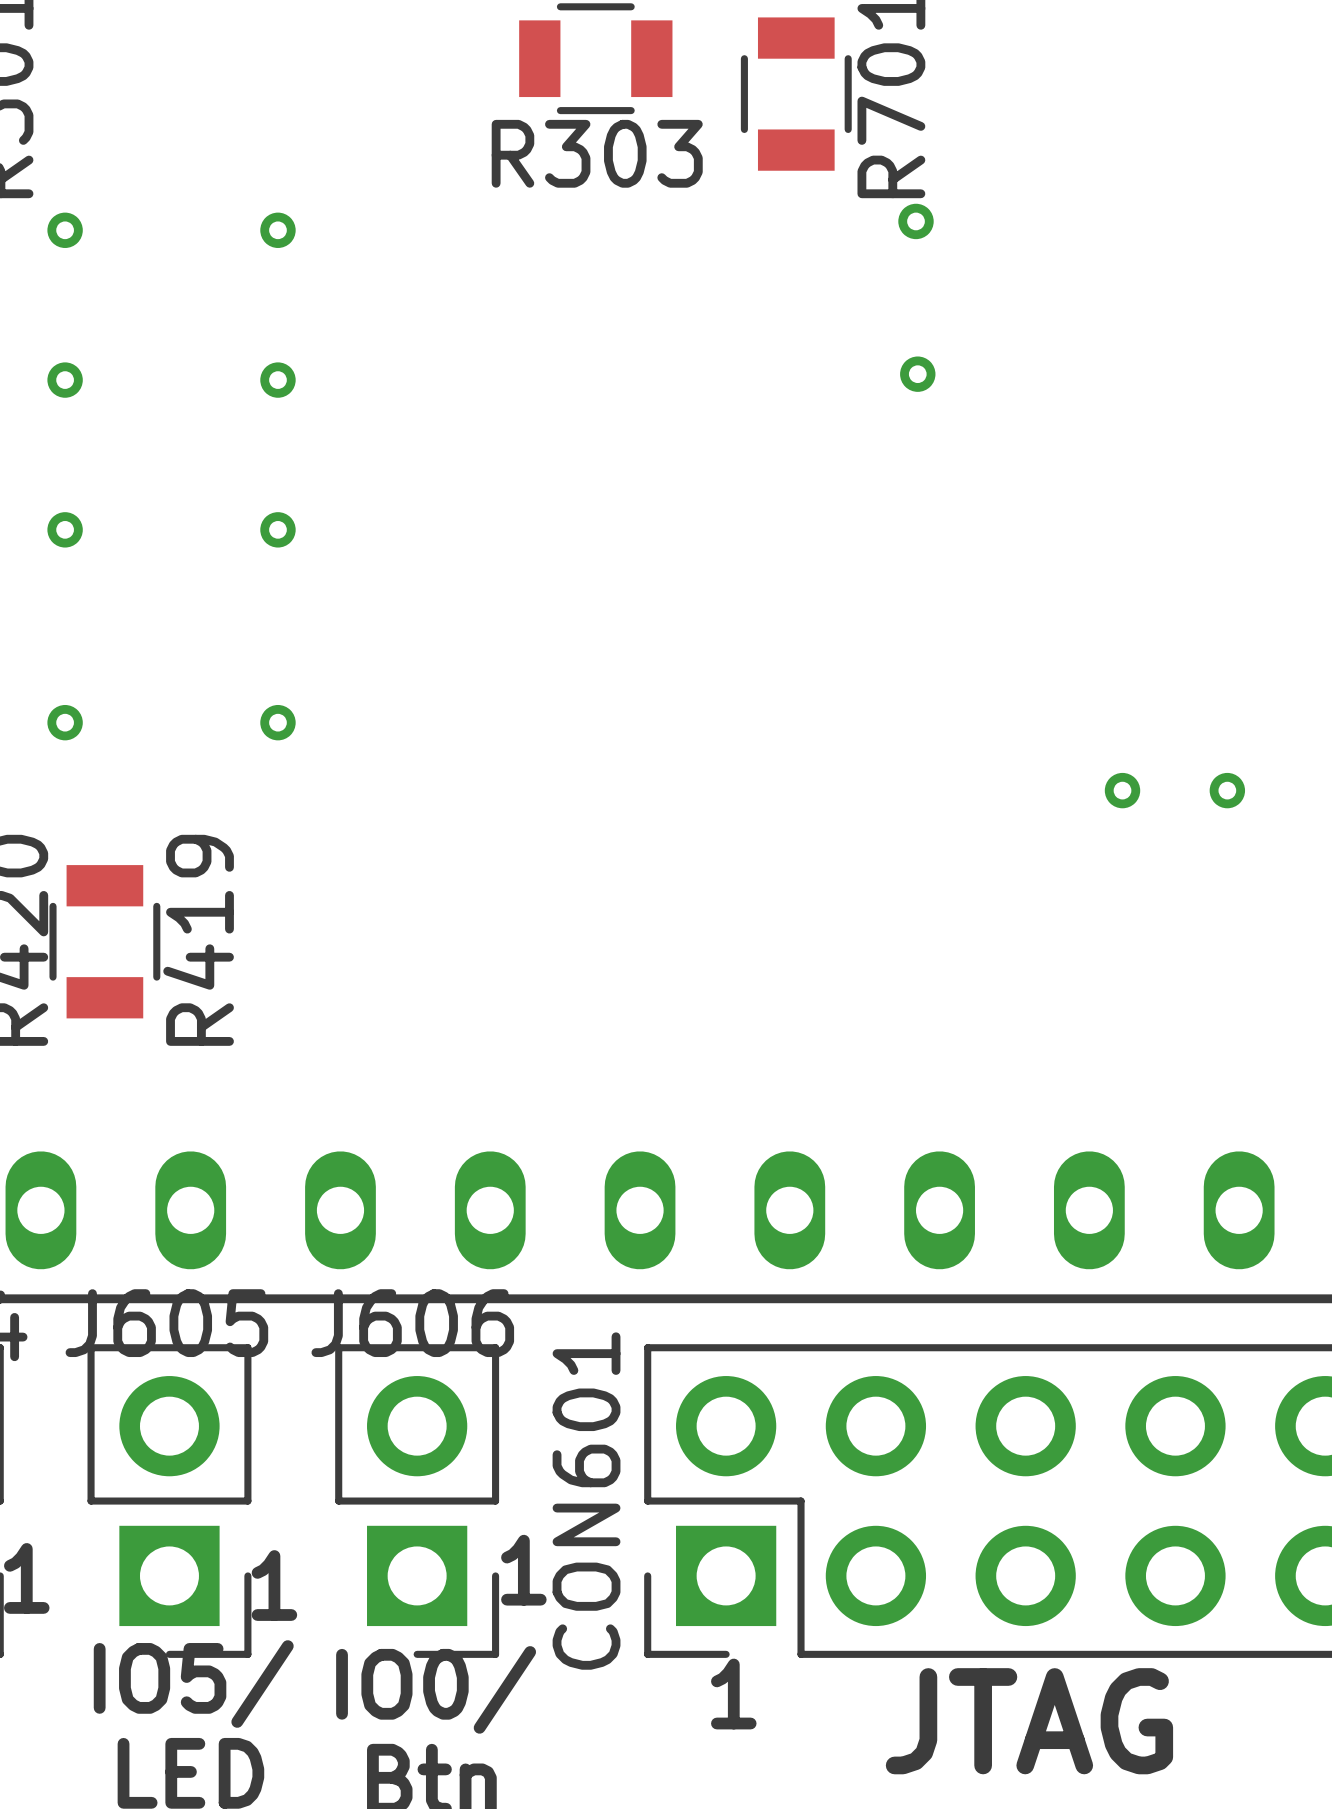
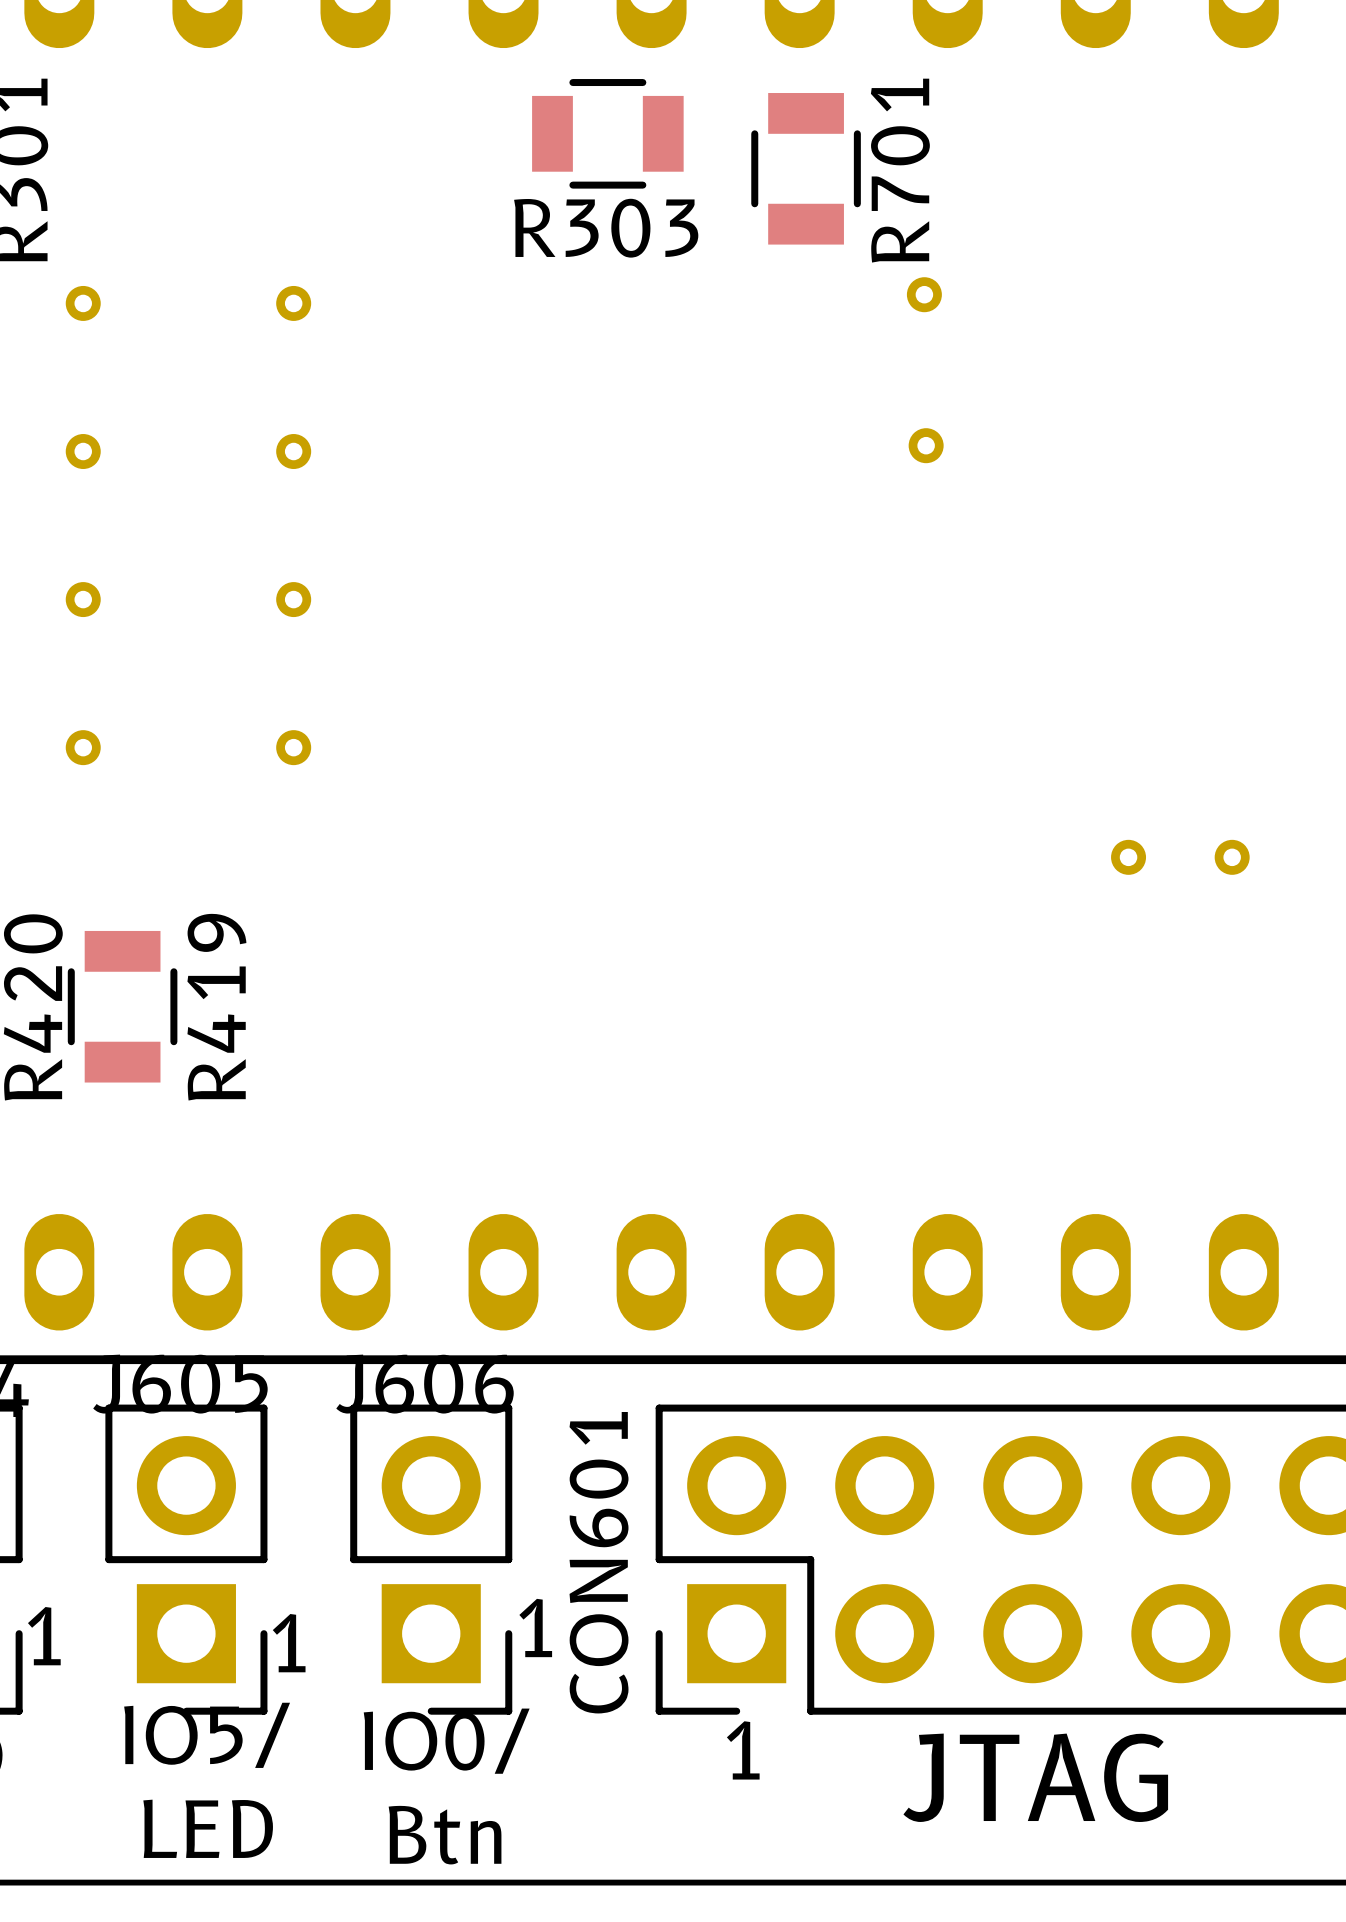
part position: (65, 722) -> (83, 747)
part position: (277, 722) -> (293, 747)

